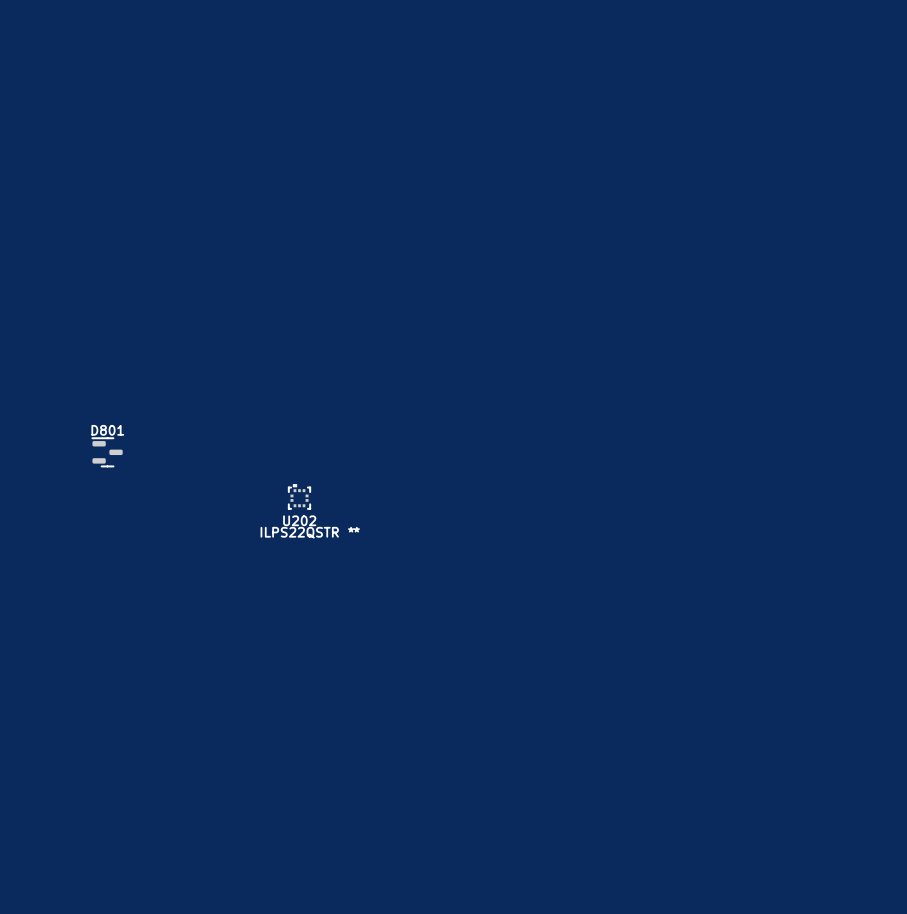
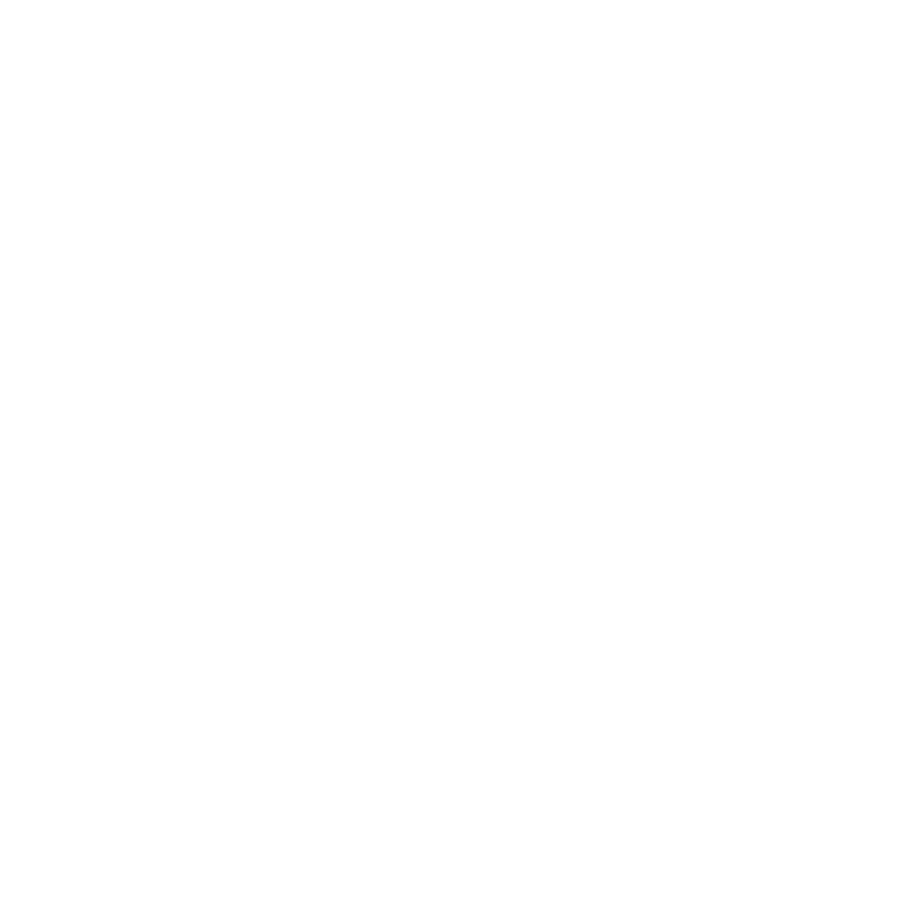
D801: (107, 452) -> none
U202: ILPS22QSTR (299, 496) -> none

